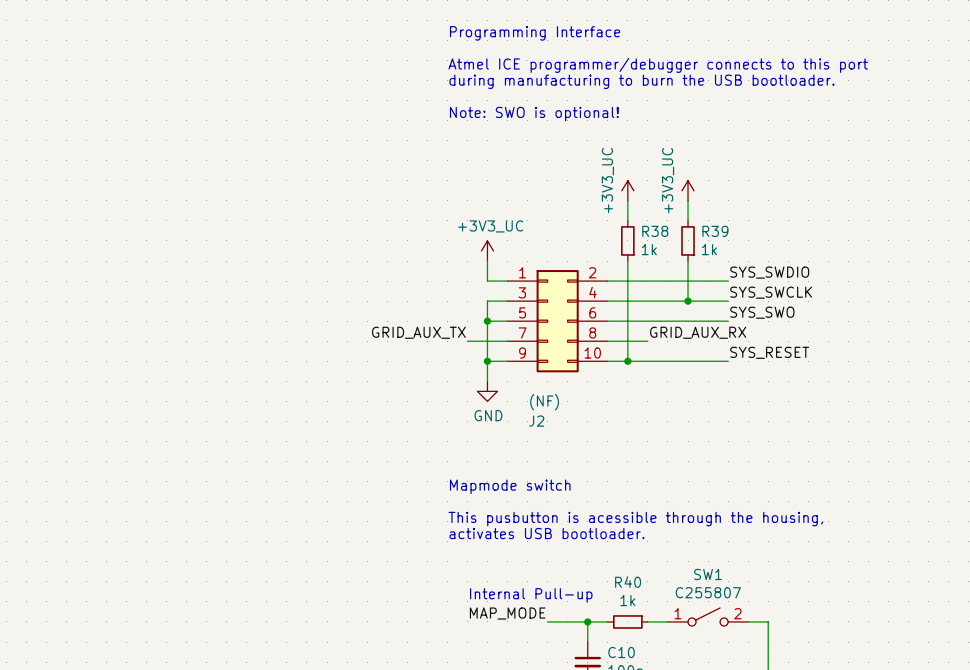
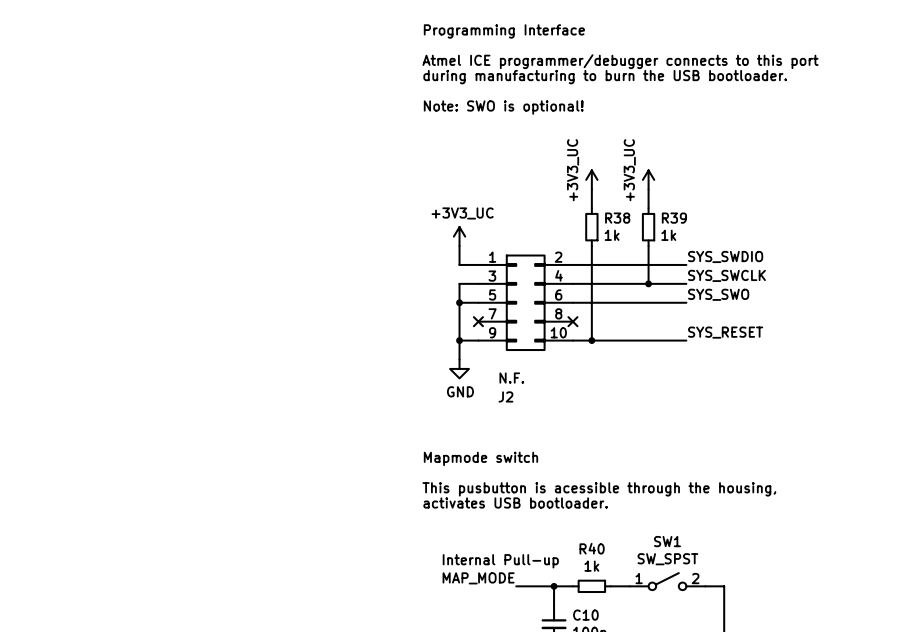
label: GRID_AUX_TX (418, 332) -> none
label: GRID_AUX_RX (698, 332) -> none
wire: (467, 341) (507, 341) -> none
no-connect mark: none -> (478, 321)
wire: (607, 341) (647, 341) -> none
no-connect mark: none -> (572, 321)
J2 value: (NF) (544, 402) -> N.F. (511, 378)
SW1 value: C255807 (708, 592) -> SW_SPST (667, 559)

